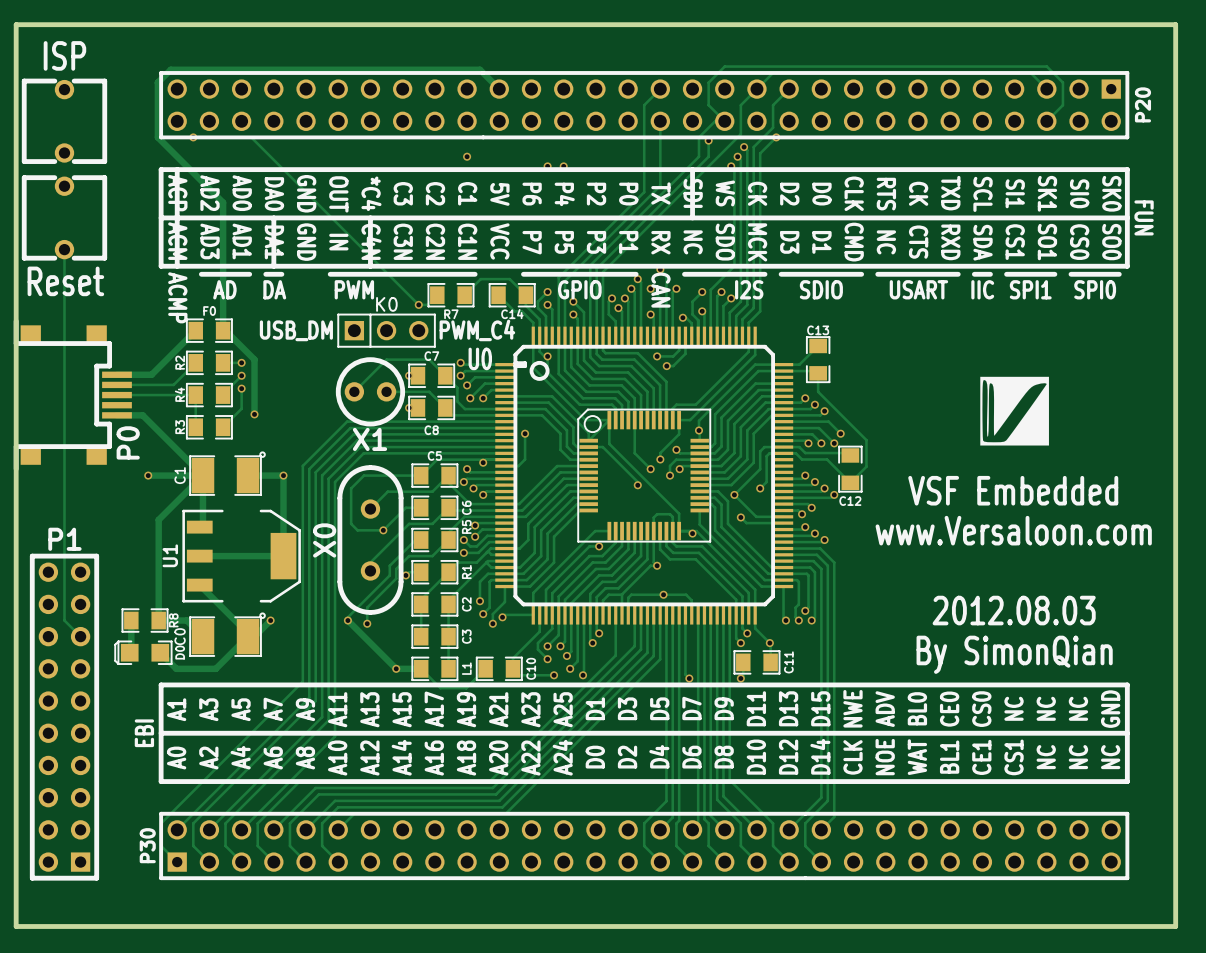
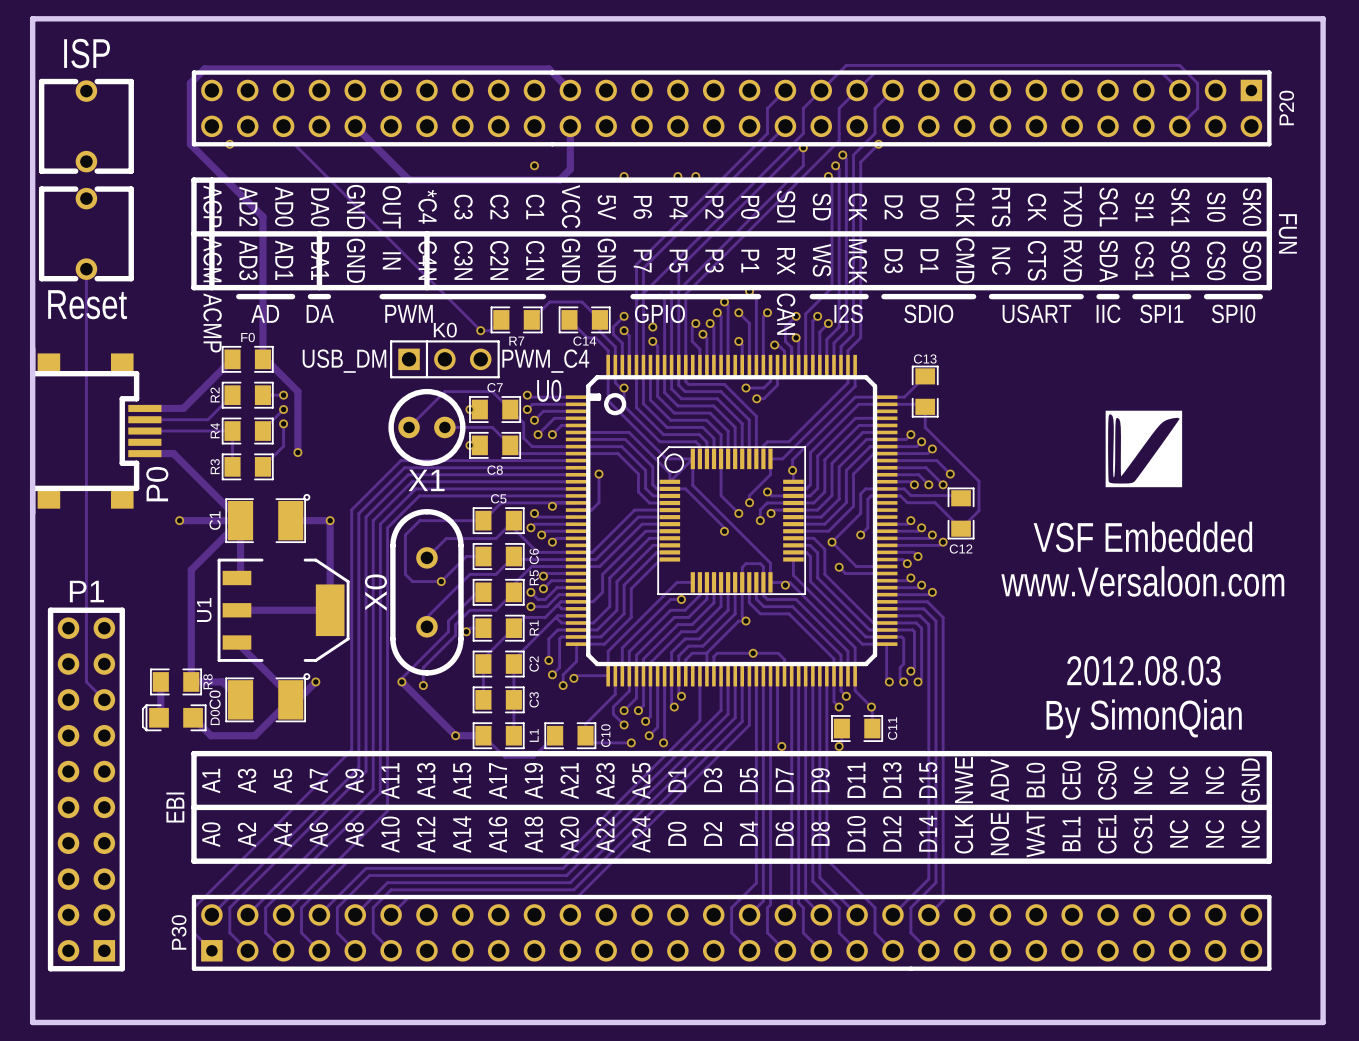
track: (747, 66) (724, 66) (708, 82) (708, 105) (724, 121) (715, 121) (708, 127) -> (846, 65) (803, 108) (803, 133)
track: (660, 89) (644, 105) (644, 192) -> (792, 144) (731, 205)
track: none -> (785, 90) (767, 108) (767, 133) (636, 264) (636, 300)
track: none -> (355, 126) (409, 180) (559, 180) (570, 169) (570, 126)
track: (660, 121) (660, 185) -> (803, 147) (799, 147) (749, 198)
track: none -> (785, 126) (643, 268) (643, 304)
track: (698, 137) (698, 156) (590, 265) -> none
via: (563, 166) -> none
via: none -> (677, 176)
via: none -> (695, 176)
line: (692, 169) (692, 217) -> none
text: TX (660, 193) -> P0 (750, 207)
text: WS (725, 193) -> SD (821, 206)
text: 5V (499, 194) -> VCC (571, 206)
text: P6 (532, 194) -> 5V (606, 207)
text: P4 (564, 194) -> P6 (642, 207)
text: P2 (596, 194) -> P4 (678, 207)
text: P0 (628, 194) -> P2 (714, 207)
text: VCC (499, 241) -> GND (571, 260)
text: P7 (532, 242) -> GND (606, 260)
text: P5 (564, 242) -> P7 (642, 261)
text: P3 (596, 242) -> P5 (678, 261)
text: P1 (628, 242) -> P3 (714, 261)
text: RX (660, 242) -> P1 (750, 261)
text: NC (693, 242) -> RX (786, 261)
text: SDO (725, 242) -> WS (821, 260)
track: (596, 249) (565, 281) -> (678, 268) (678, 290)
line: (523, 274) (555, 274) -> none
line: (684, 274) (716, 274) -> (722, 296) (758, 296)
text position: CAN (660, 290) -> CAN (786, 314)
track: (573, 301) (584, 312) -> (659, 294) (664, 299) (664, 338)

